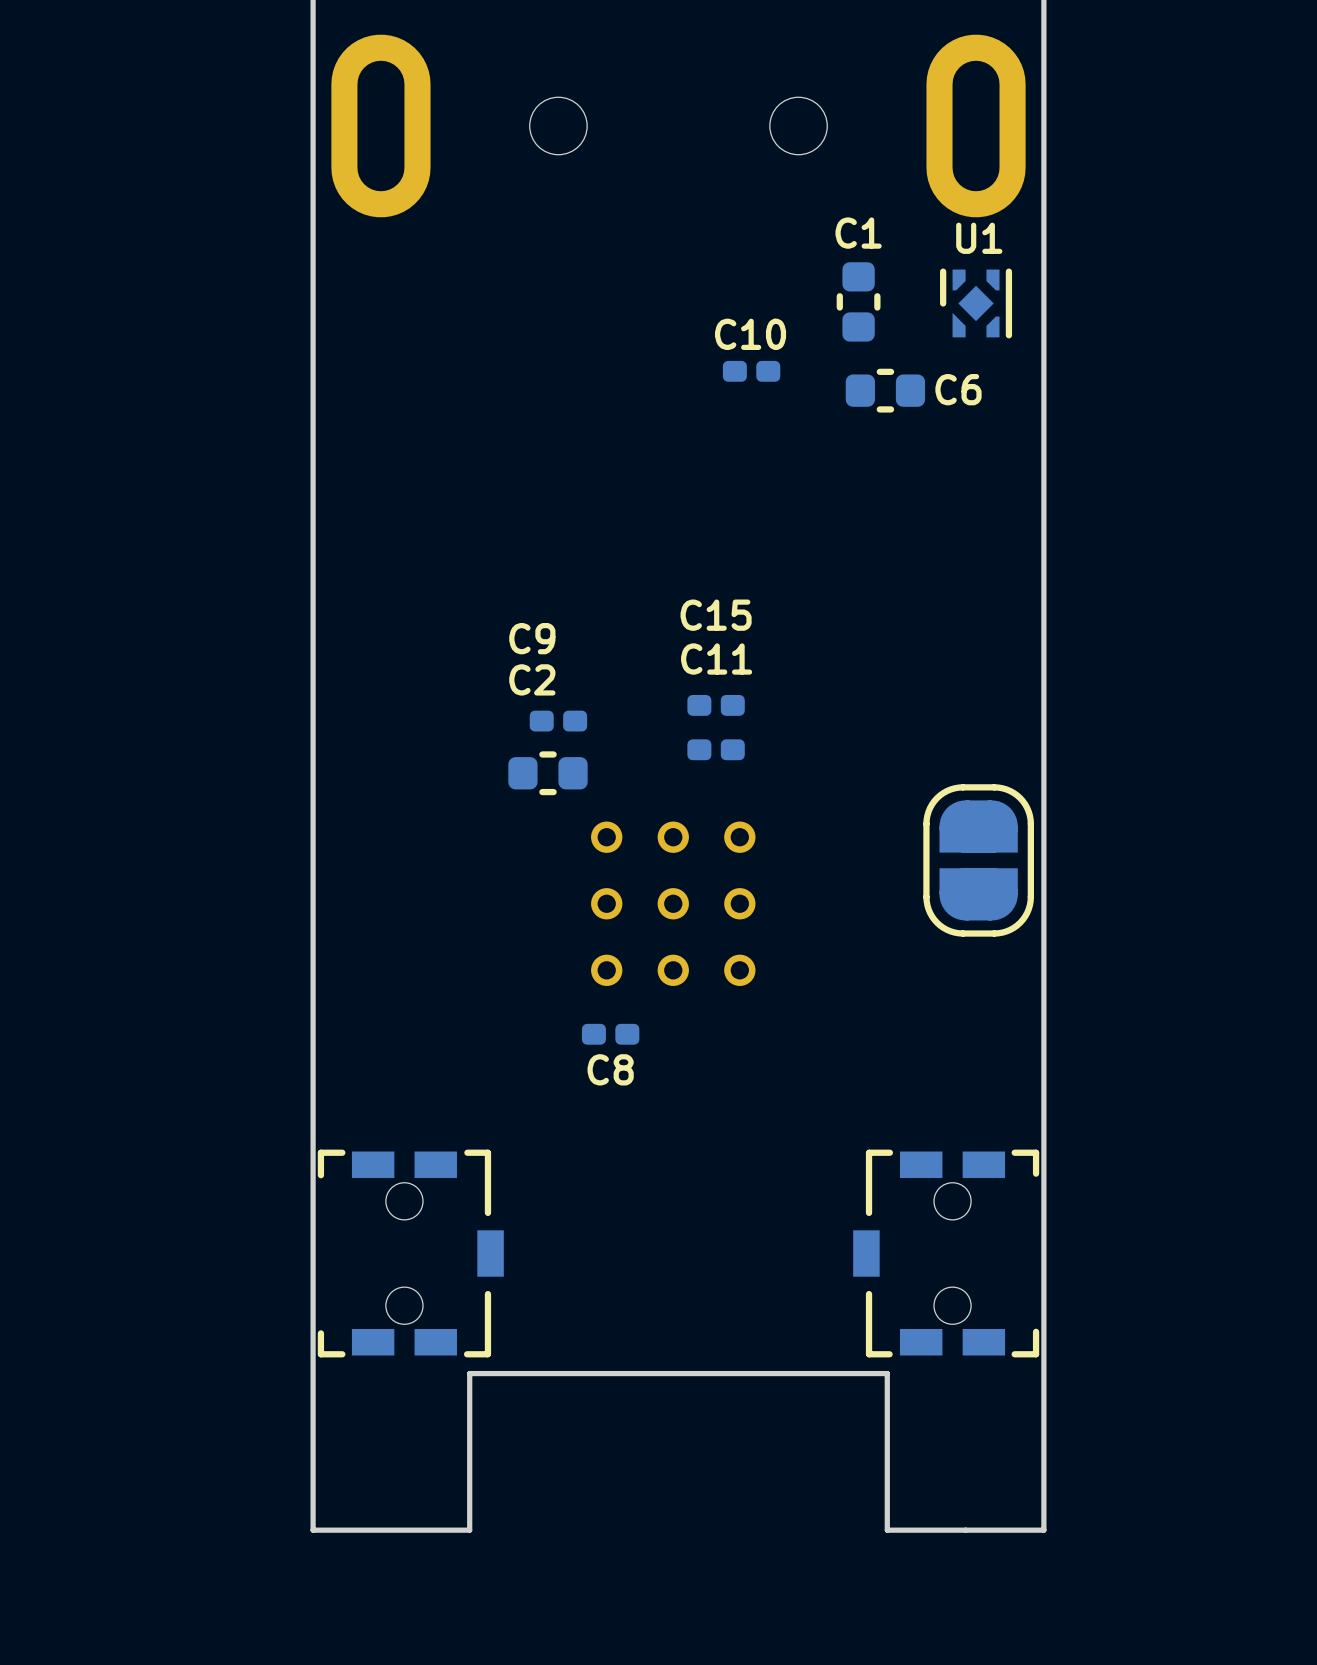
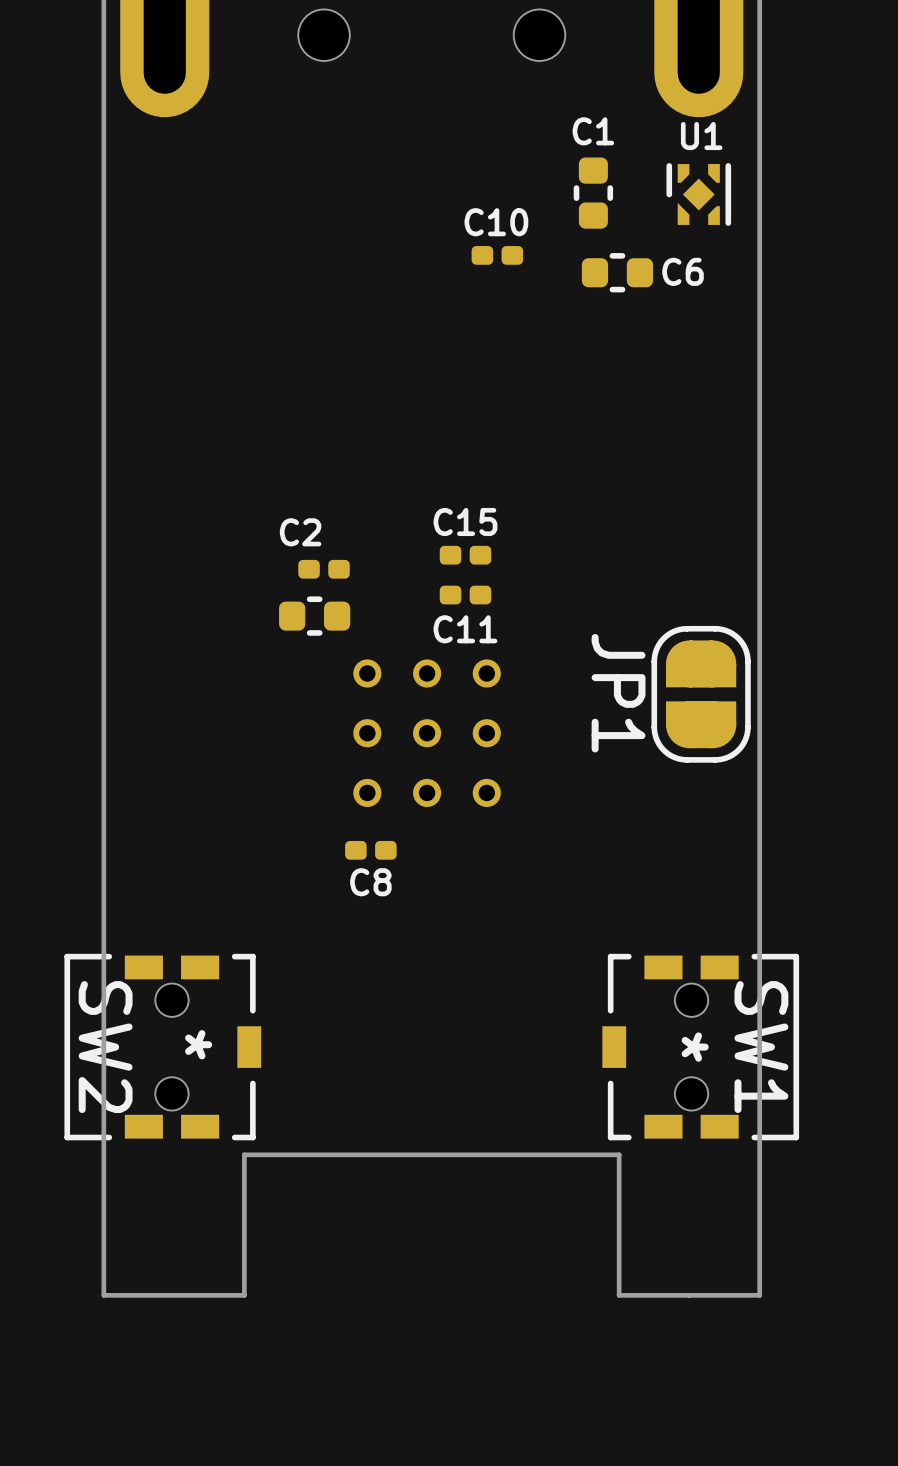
C15 name position: C15 (716, 615) -> C15 (465, 522)
C9 name: C9 (532, 638) -> none
C11 name position: C11 (716, 659) -> C11 (465, 629)
JP1 name: none -> JP1 (618, 693)
SW2: none -> (162, 1047)
part: (410, 1253) -> none
part: (946, 1253) -> none
SW1: none -> (700, 1047)

